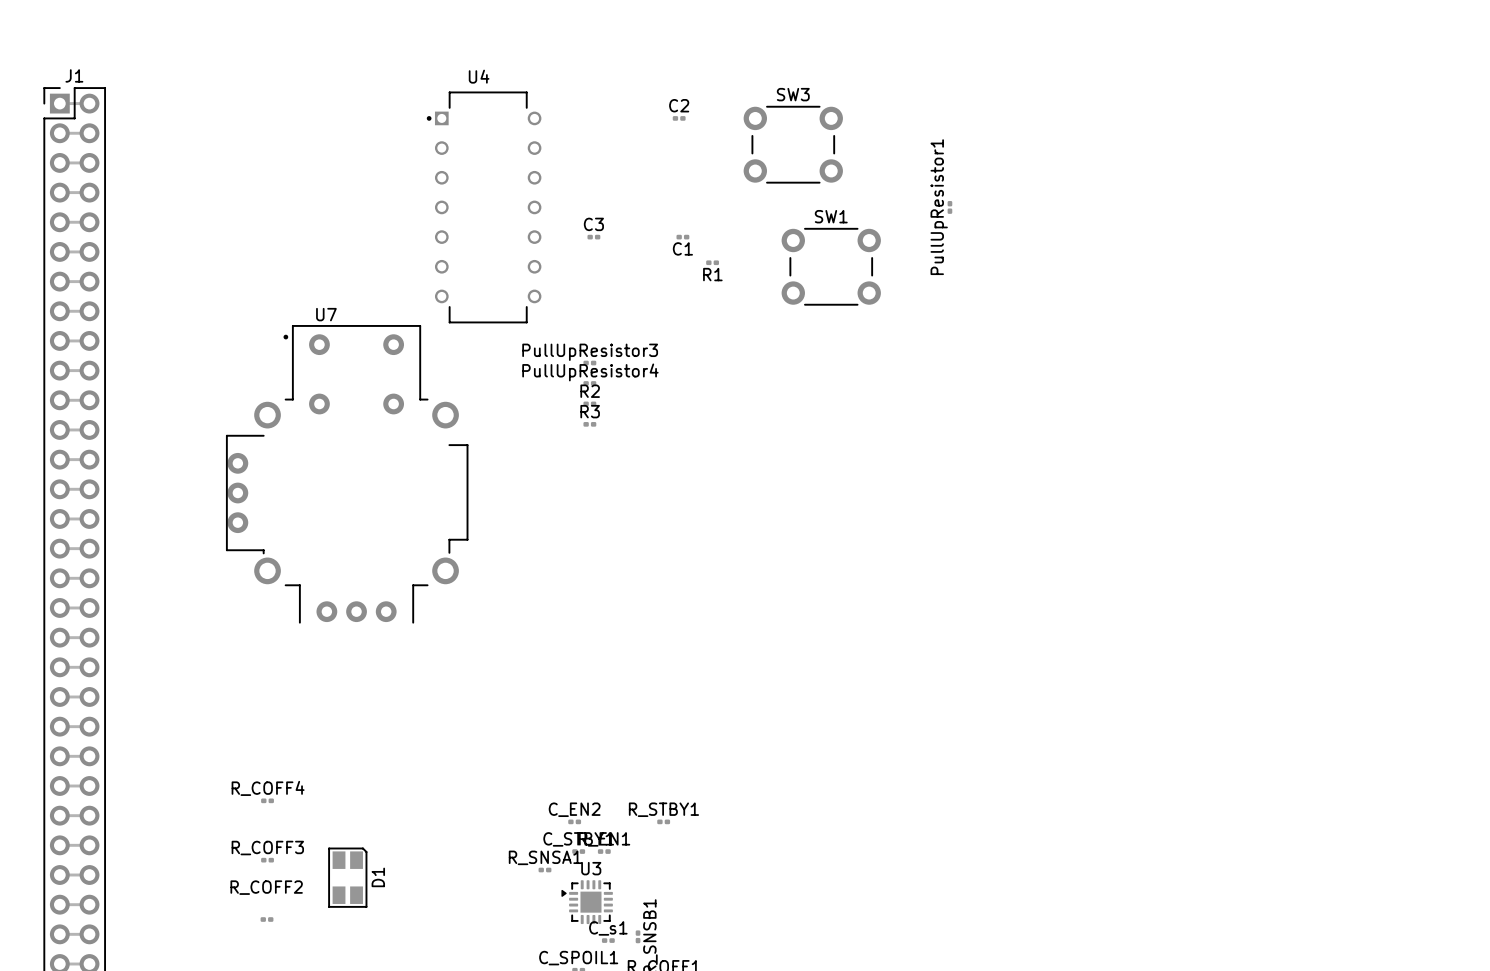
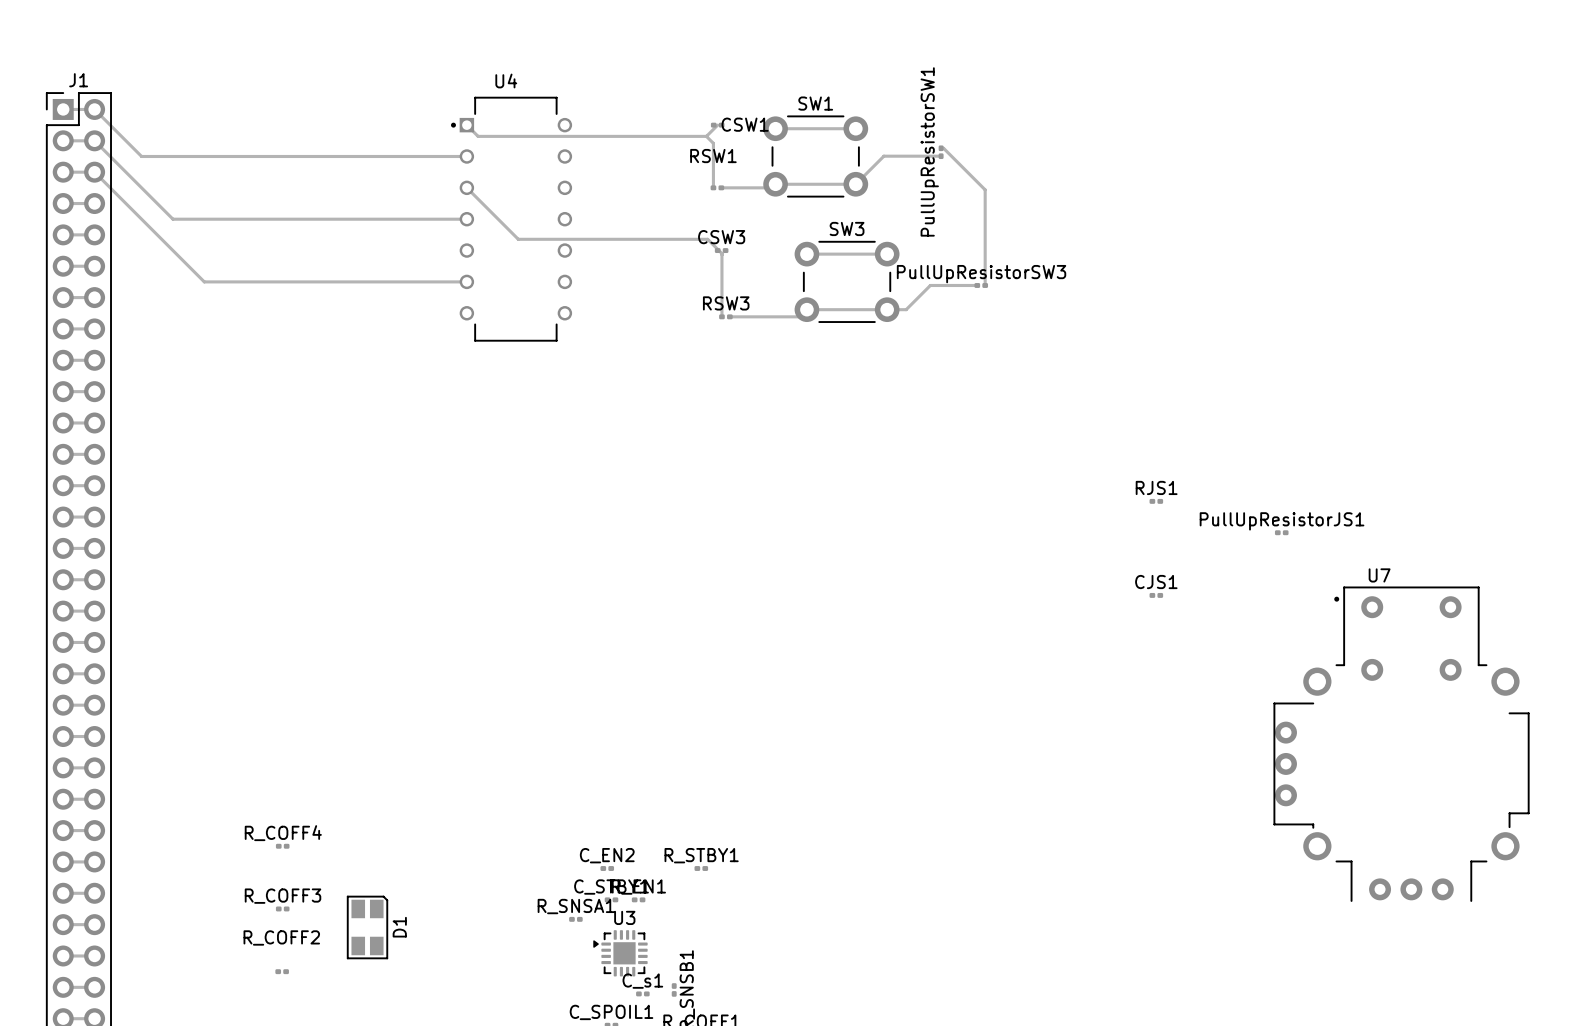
track: none -> (94, 109) (141, 156) (466, 156)
C2 name: C2 (679, 105) -> CSW1 (745, 124)
track: none -> (466, 125) (478, 136) (706, 136)
track: none -> (717, 125) (706, 136)
track: none -> (775, 128) (855, 128)
track: none -> (706, 136) (713, 143) (713, 187)
track: none -> (94, 140) (172, 219) (466, 219)
track: none -> (941, 148) (943, 148) (985, 189) (985, 285)
SW3 position: (793, 144) -> (847, 281)
PullUpResistorSW1: none -> (941, 152)
track: none -> (941, 156) (883, 156) (855, 184) (775, 184) (772, 187) (721, 187)
track: none -> (94, 172) (204, 281) (466, 281)
track: none -> (466, 187) (518, 239) (707, 239) (722, 254) (721, 316)
RSW1: none -> (717, 187)
PullUpResistor1: (949, 207) -> none
C3: (593, 237) -> none
track: none -> (806, 254) (887, 254)
C1 name: C1 (682, 248) -> CSW3 (721, 237)
R1: (712, 262) -> none
SW1 position: (831, 266) -> (815, 156)
track: none -> (977, 285) (930, 285) (906, 309) (806, 309) (799, 316) (729, 316)
PullUpResistorSW3: none -> (981, 285)
RSW3: none -> (725, 316)
PullUpResistor3: (589, 363) -> none
PullUpResistor4: (589, 383) -> none
R2: (589, 403) -> none
R3: (589, 424) -> none
U7 position: (347, 474) -> (1401, 744)
RJS1: none -> (1156, 501)
PullUpResistorJS1: none -> (1281, 532)
CJS1: none -> (1156, 595)

